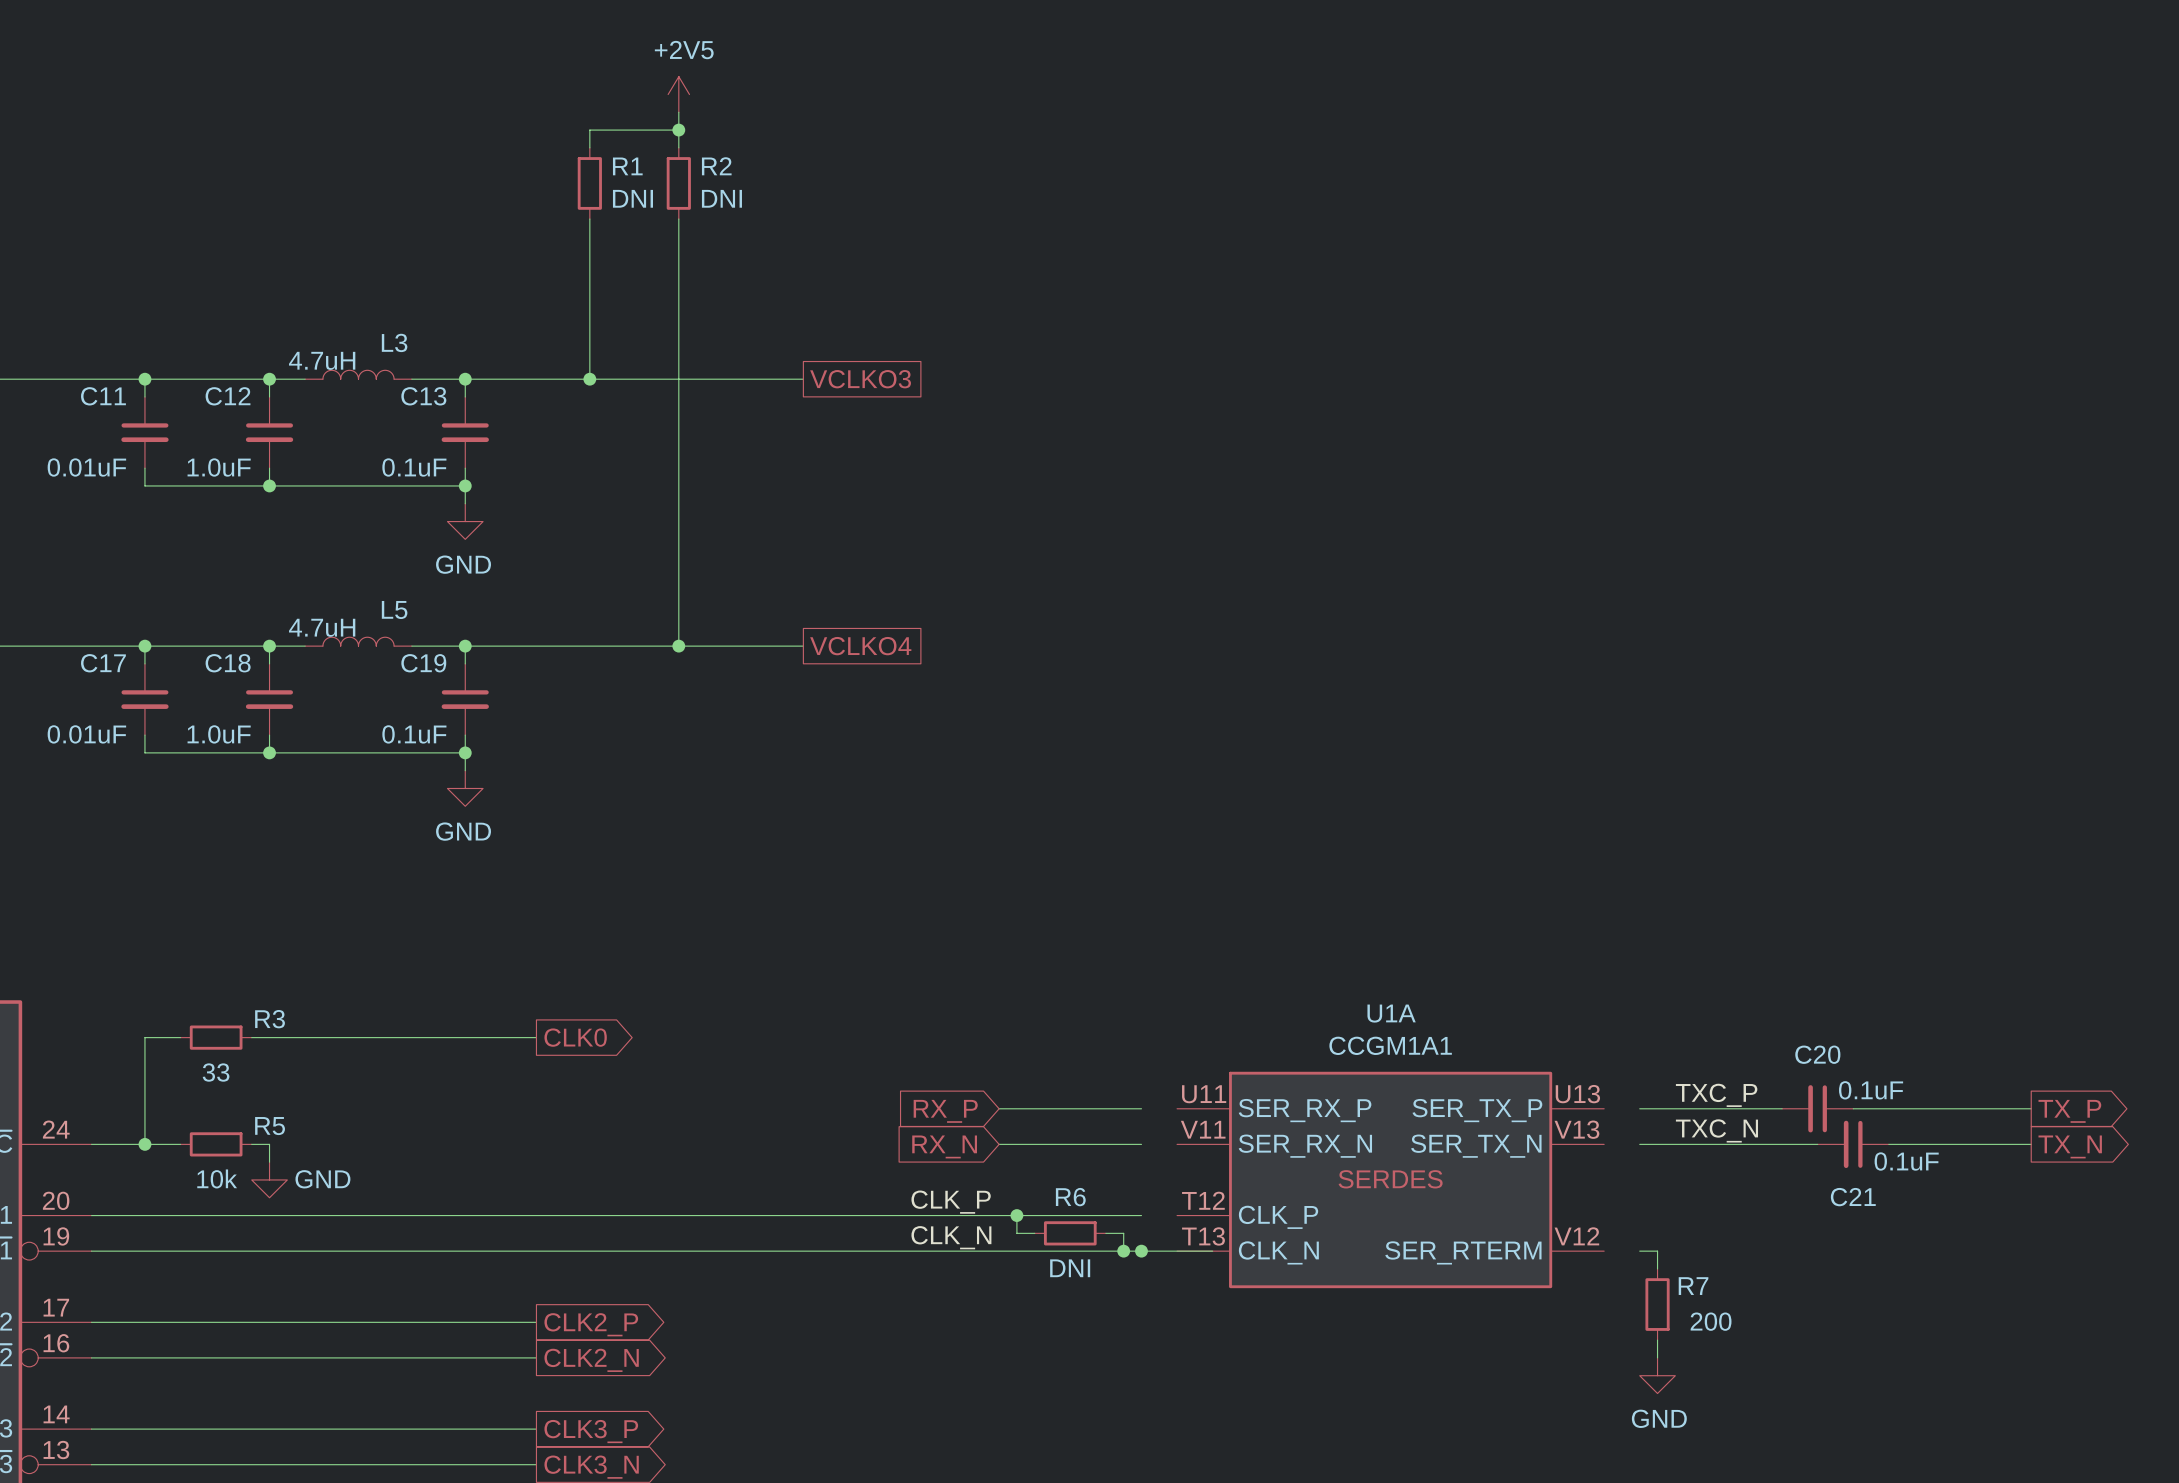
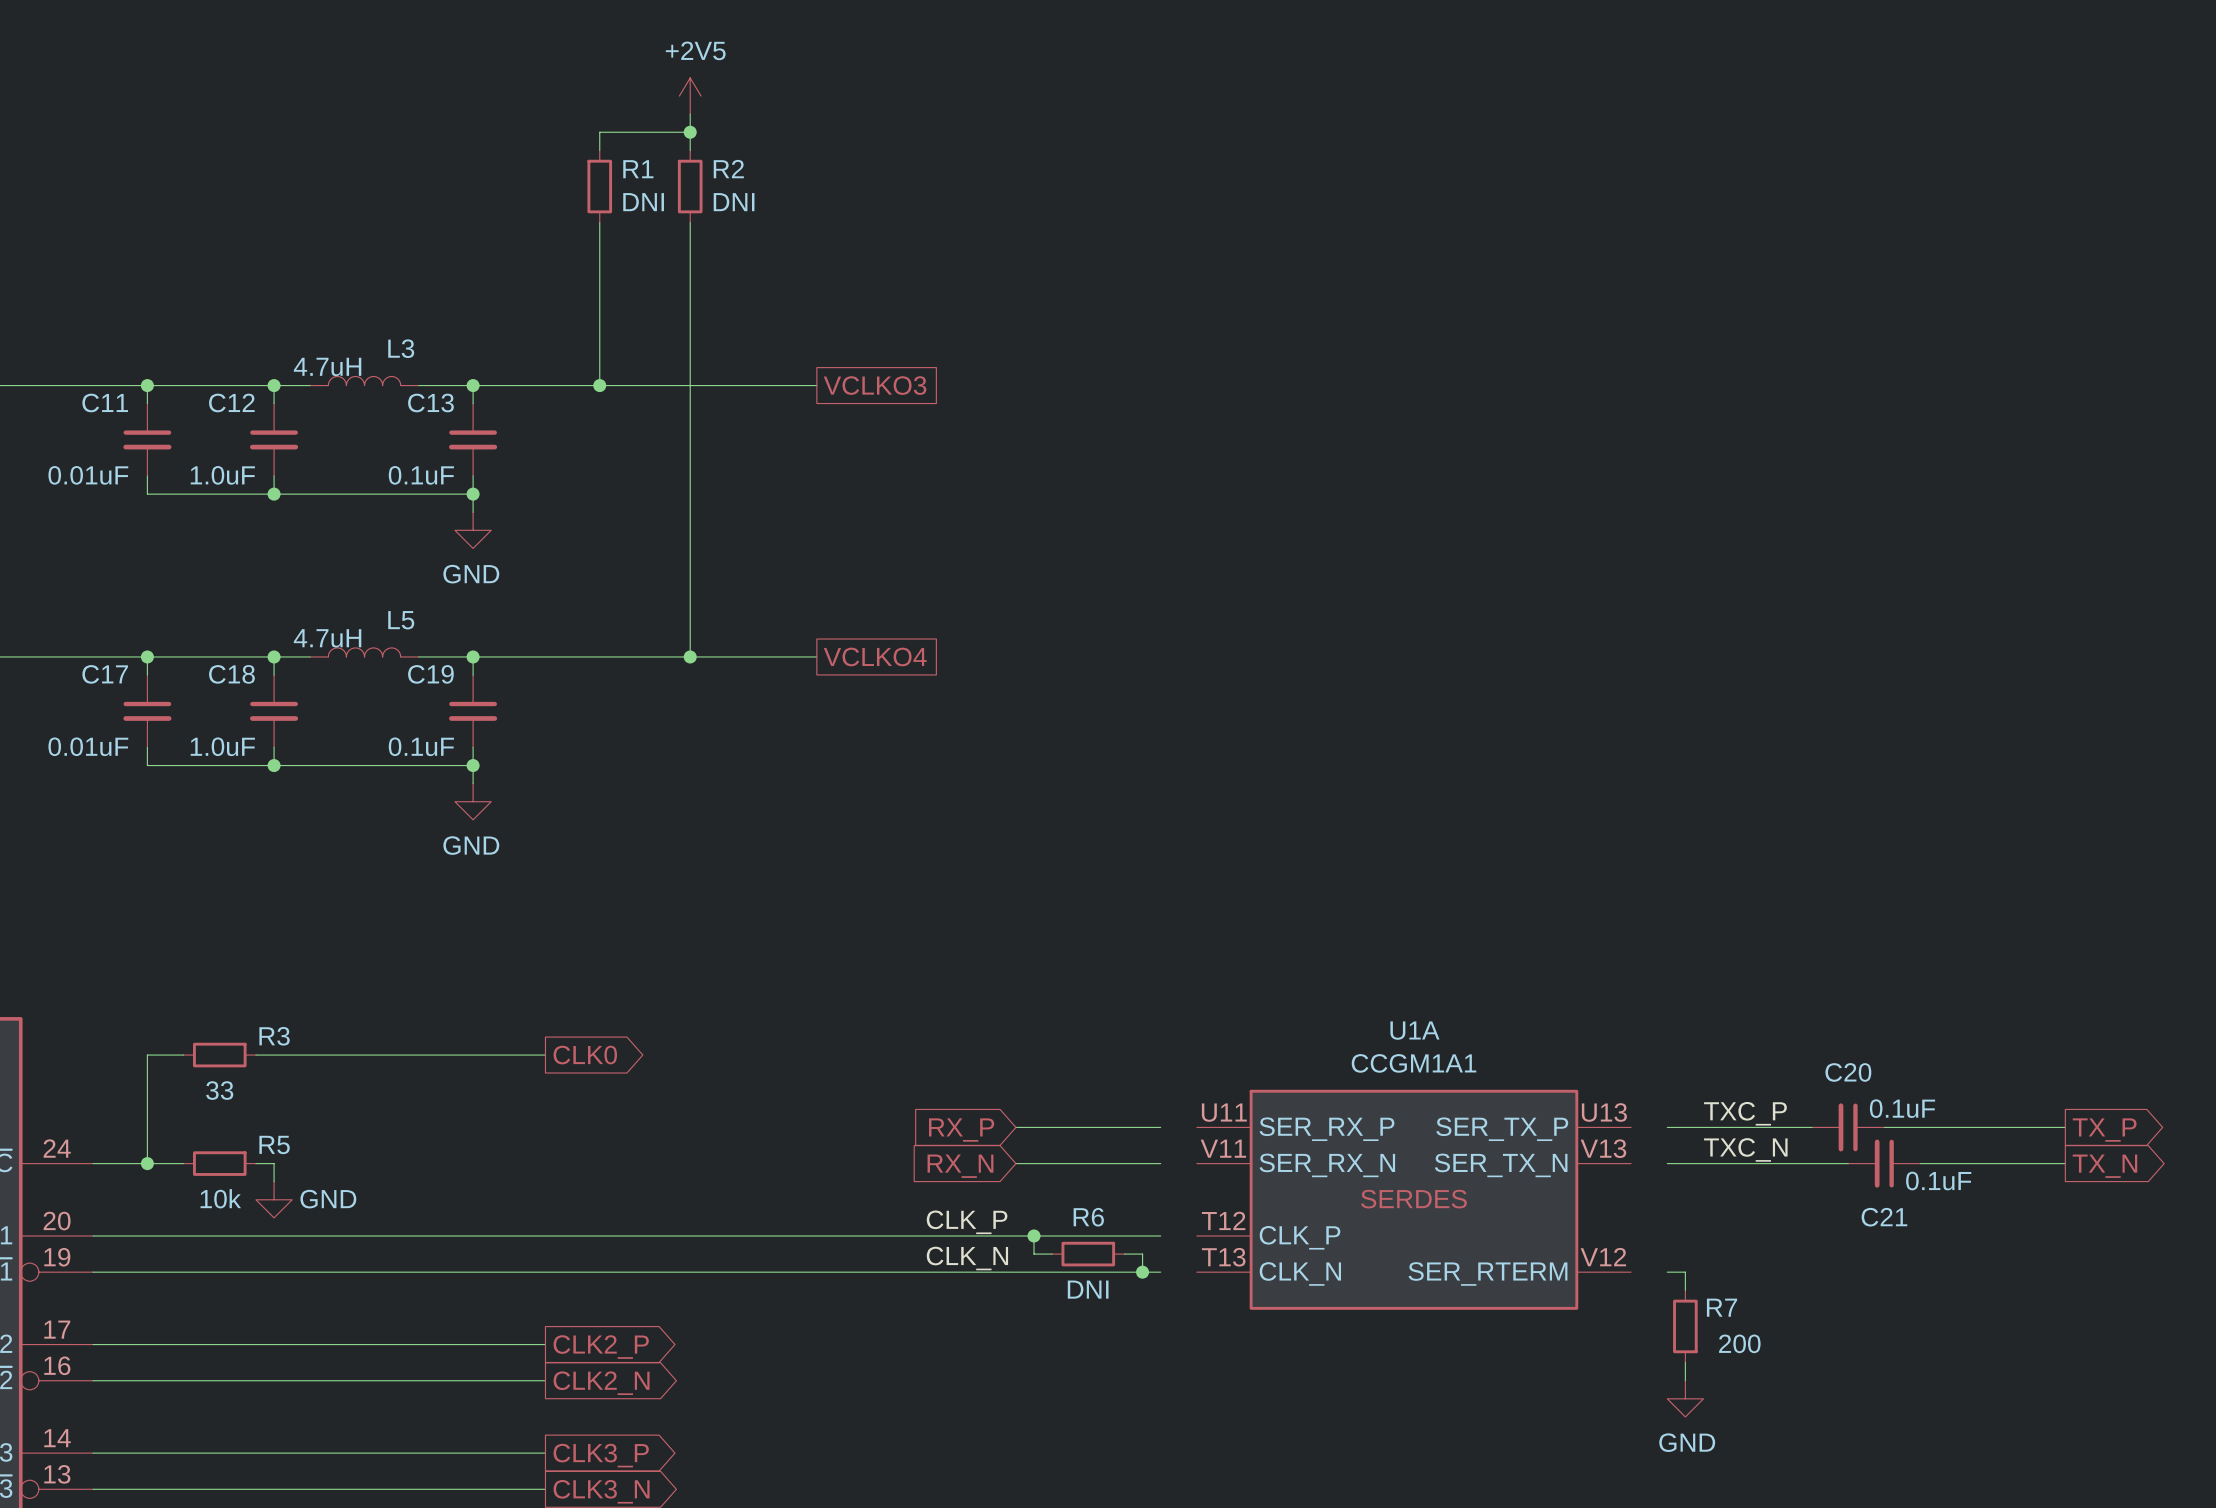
wire: (1141, 1251) (1212, 1251) -> none
junction: (1141, 1251) -> none

